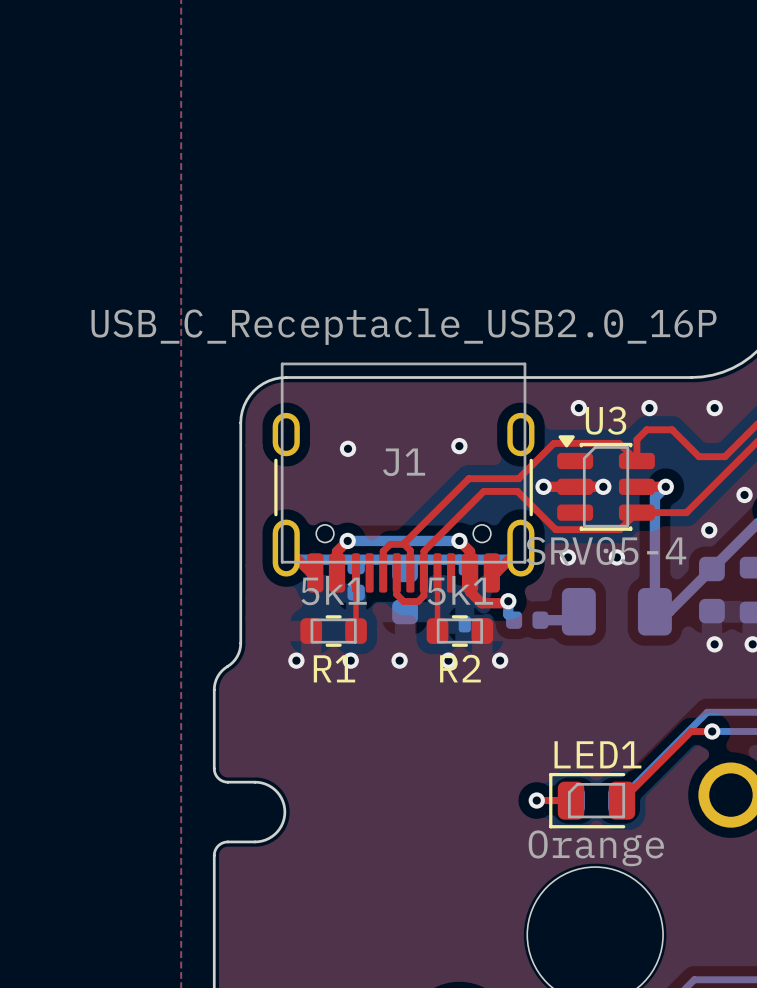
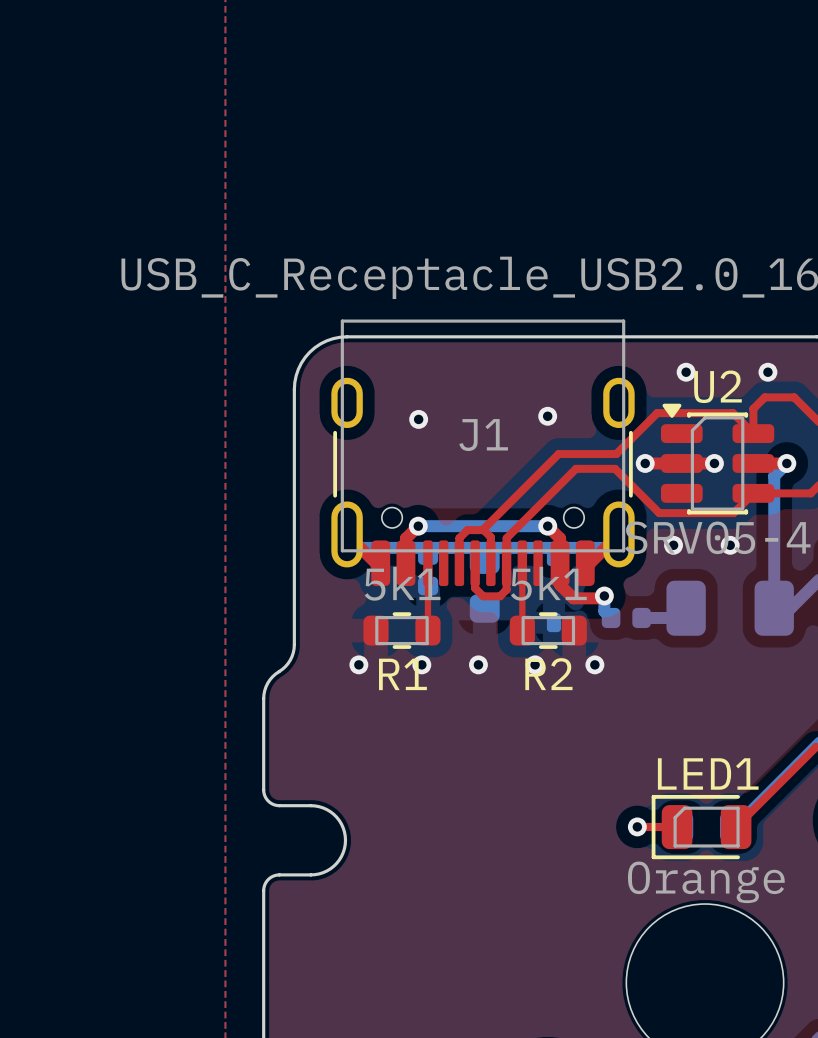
U3 name: U3 (605, 420) -> U2 (717, 386)

